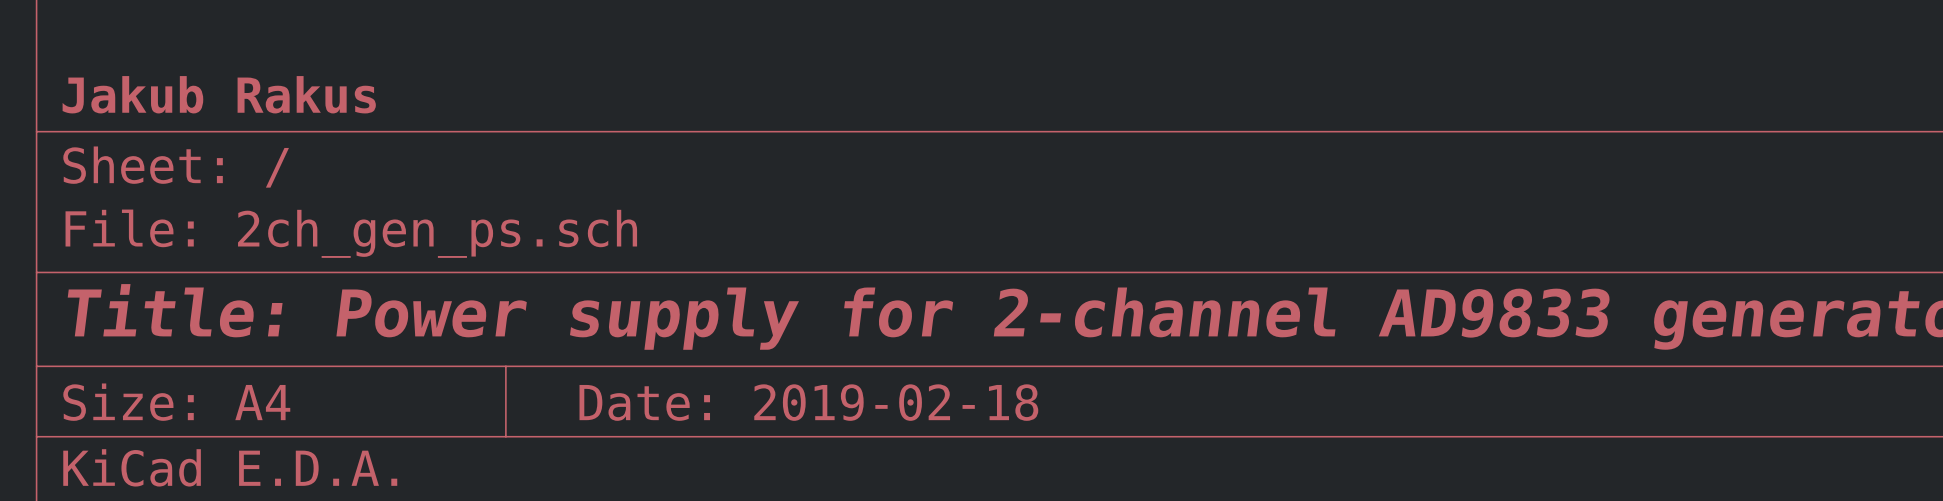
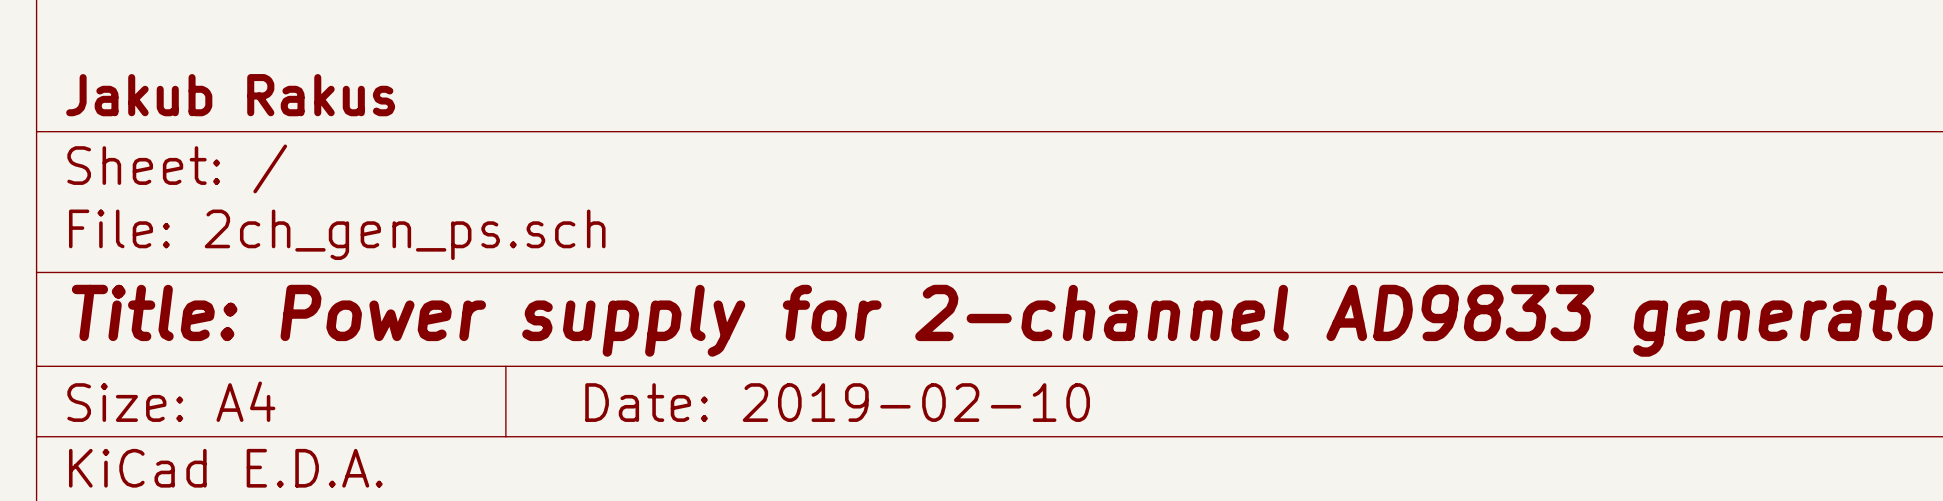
title block: Date: 2019-02-18 (808, 402) -> Date: 2019-02-10 (837, 402)

